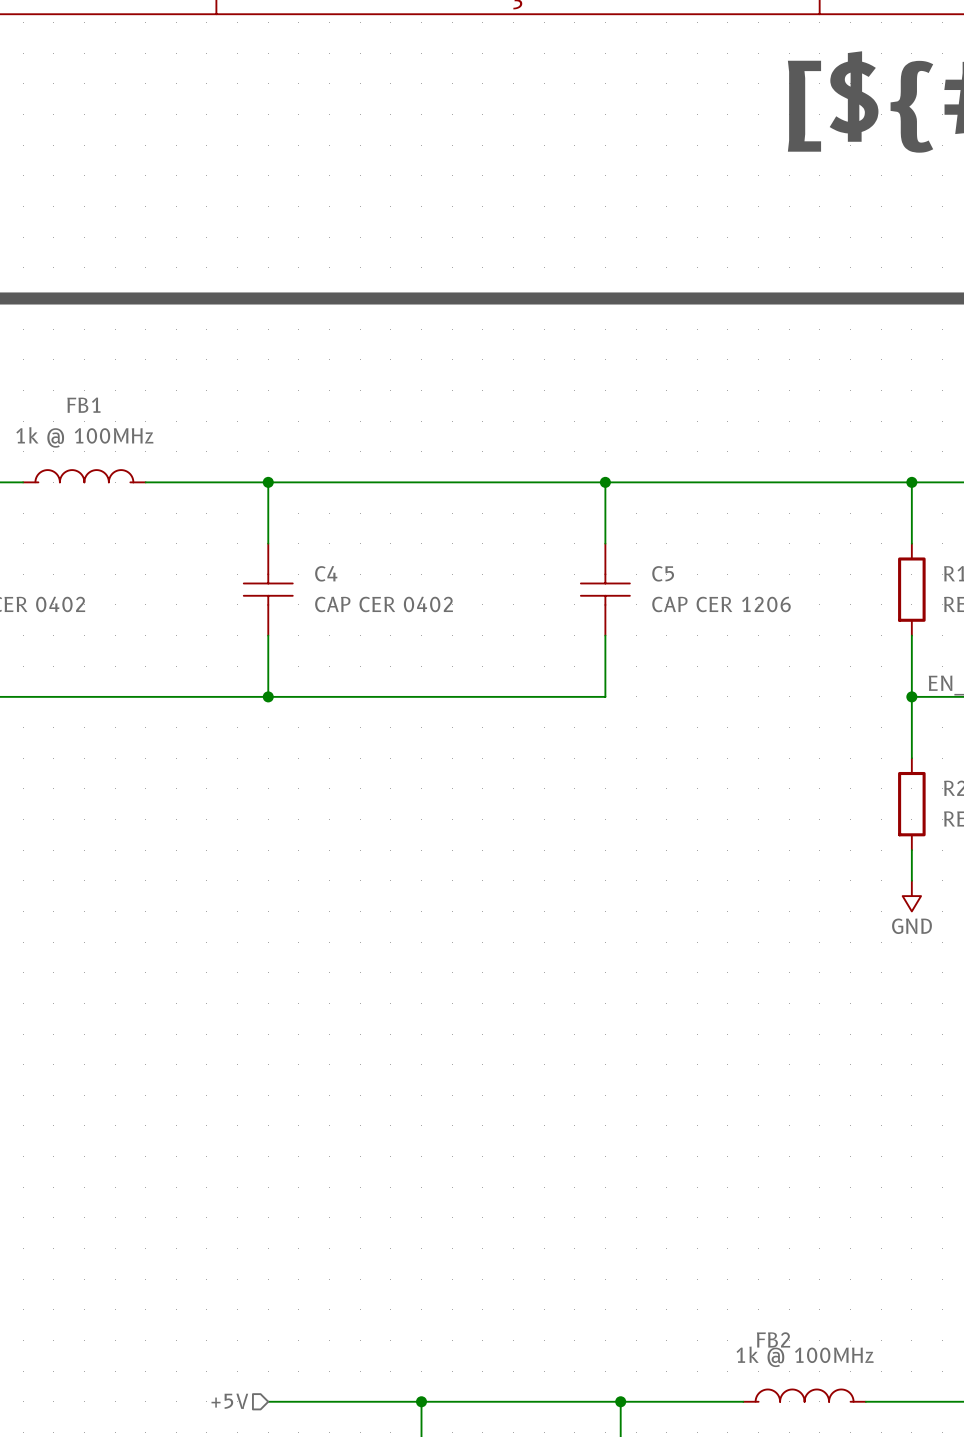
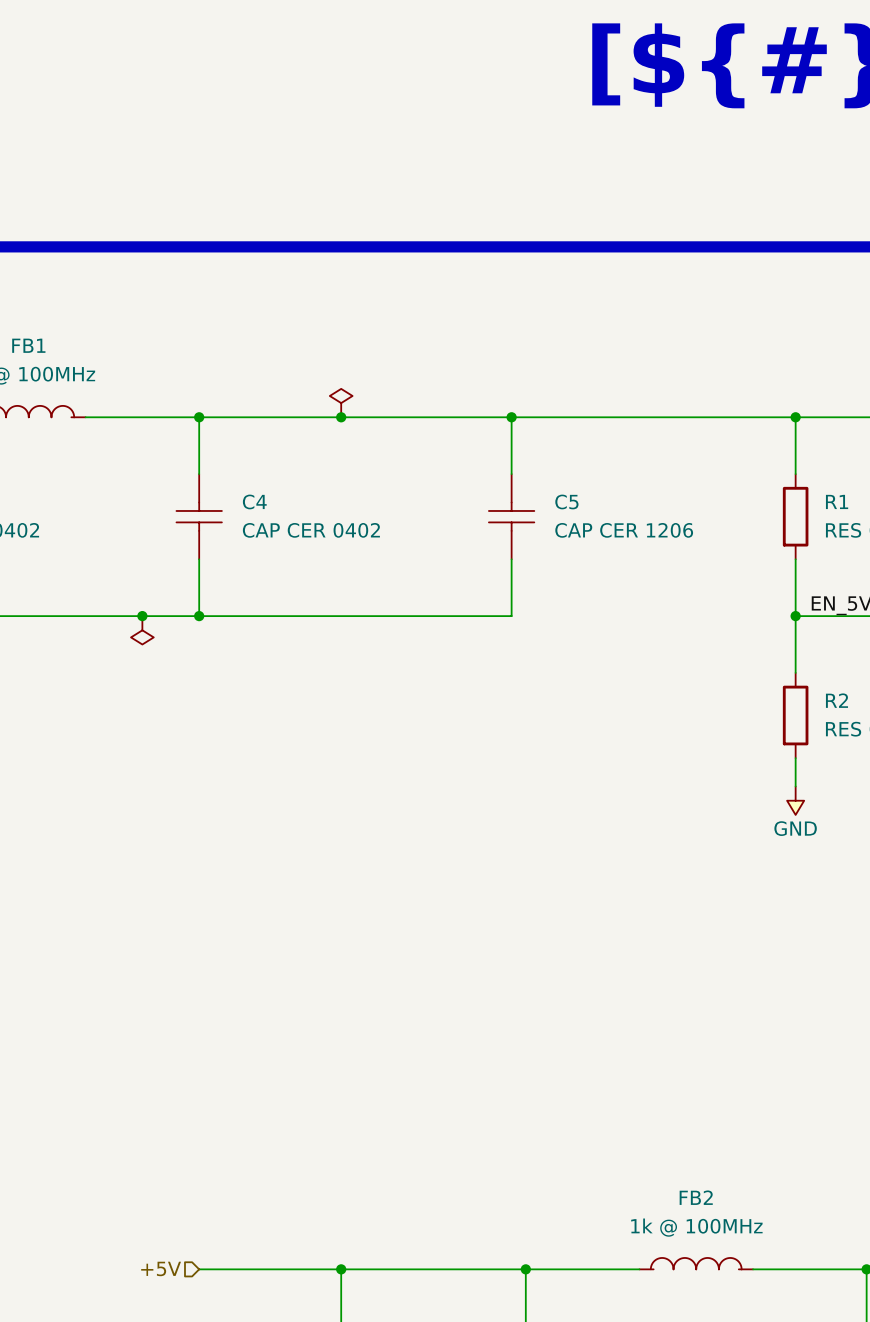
power symbol: none -> (341, 403)
junction: none -> (341, 417)
junction: none -> (142, 616)
power symbol: none -> (142, 630)
FB2 name position: FB2 (773, 1339) -> FB2 (696, 1197)

